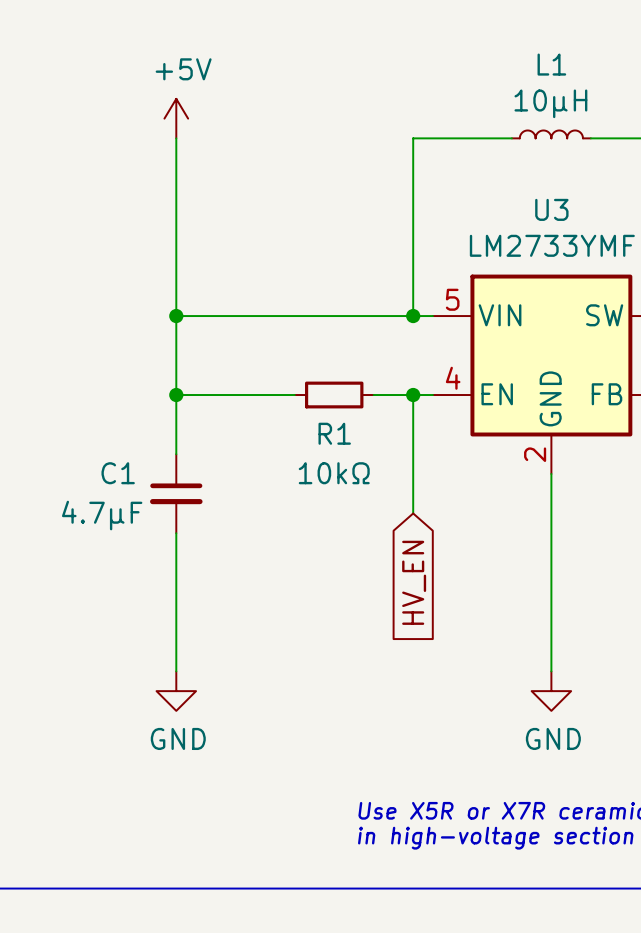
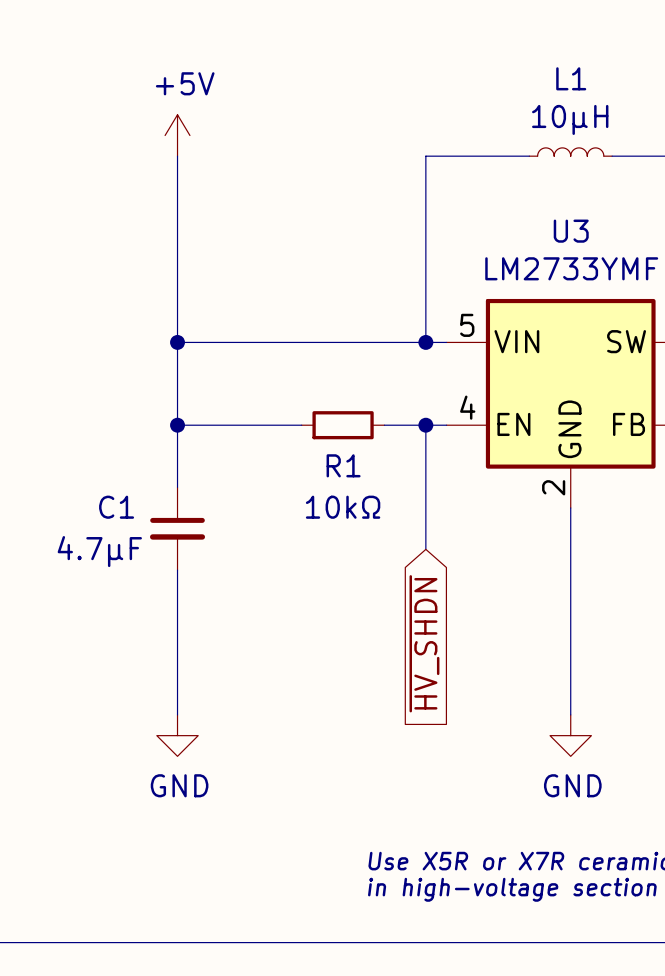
global label: HV_EN (414, 582) -> ~{HV_SHDN} (424, 643)

